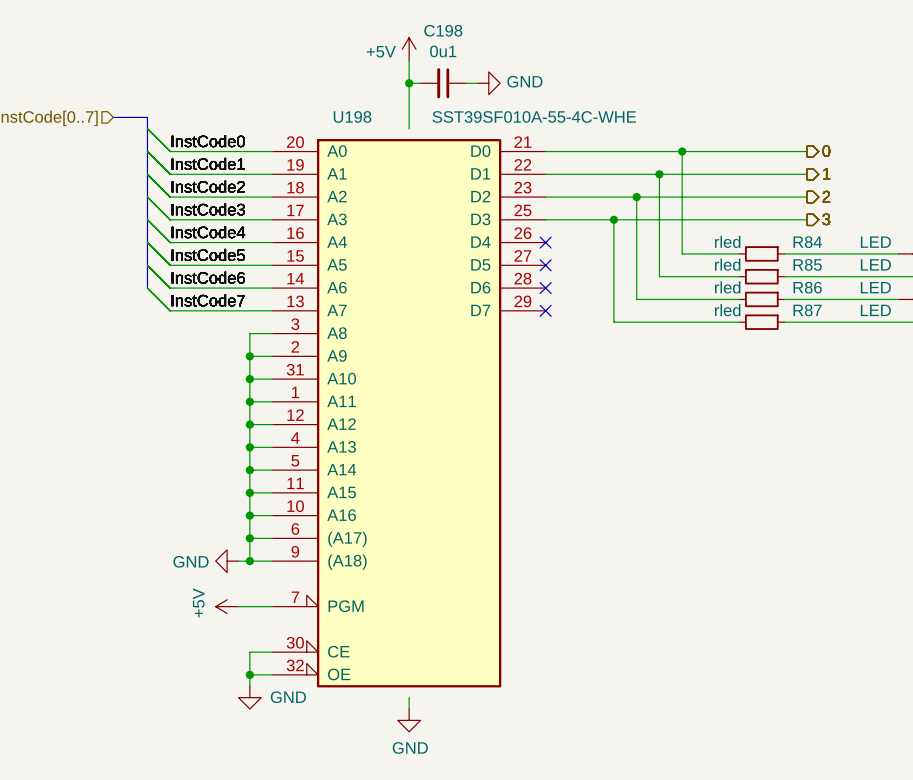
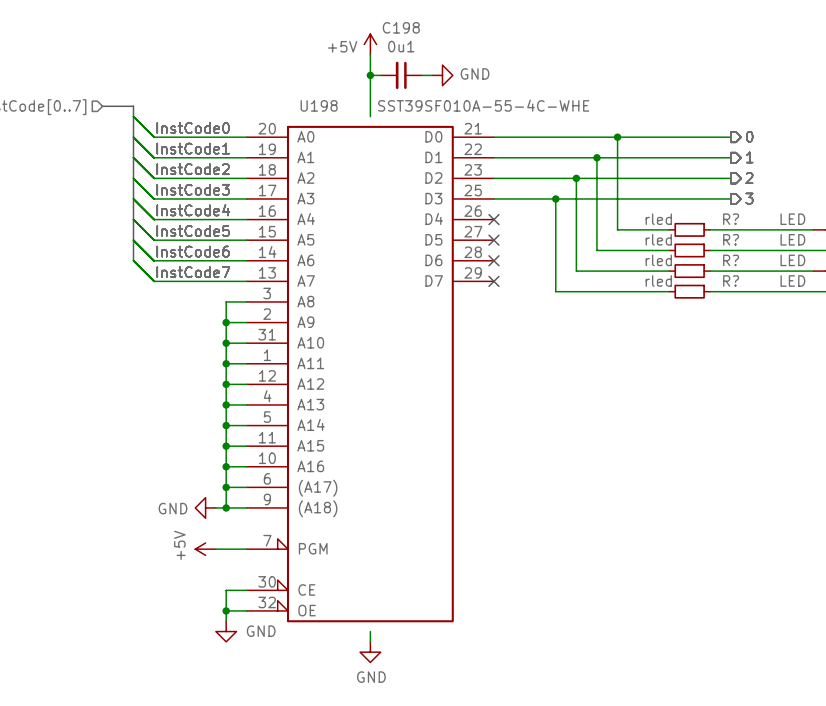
R84 name: R84 (807, 242) -> R? (731, 219)
R85 name: R85 (807, 264) -> R? (731, 239)
R86 name: R86 (807, 287) -> R? (731, 260)
R87 name: R87 (807, 310) -> R? (731, 281)

